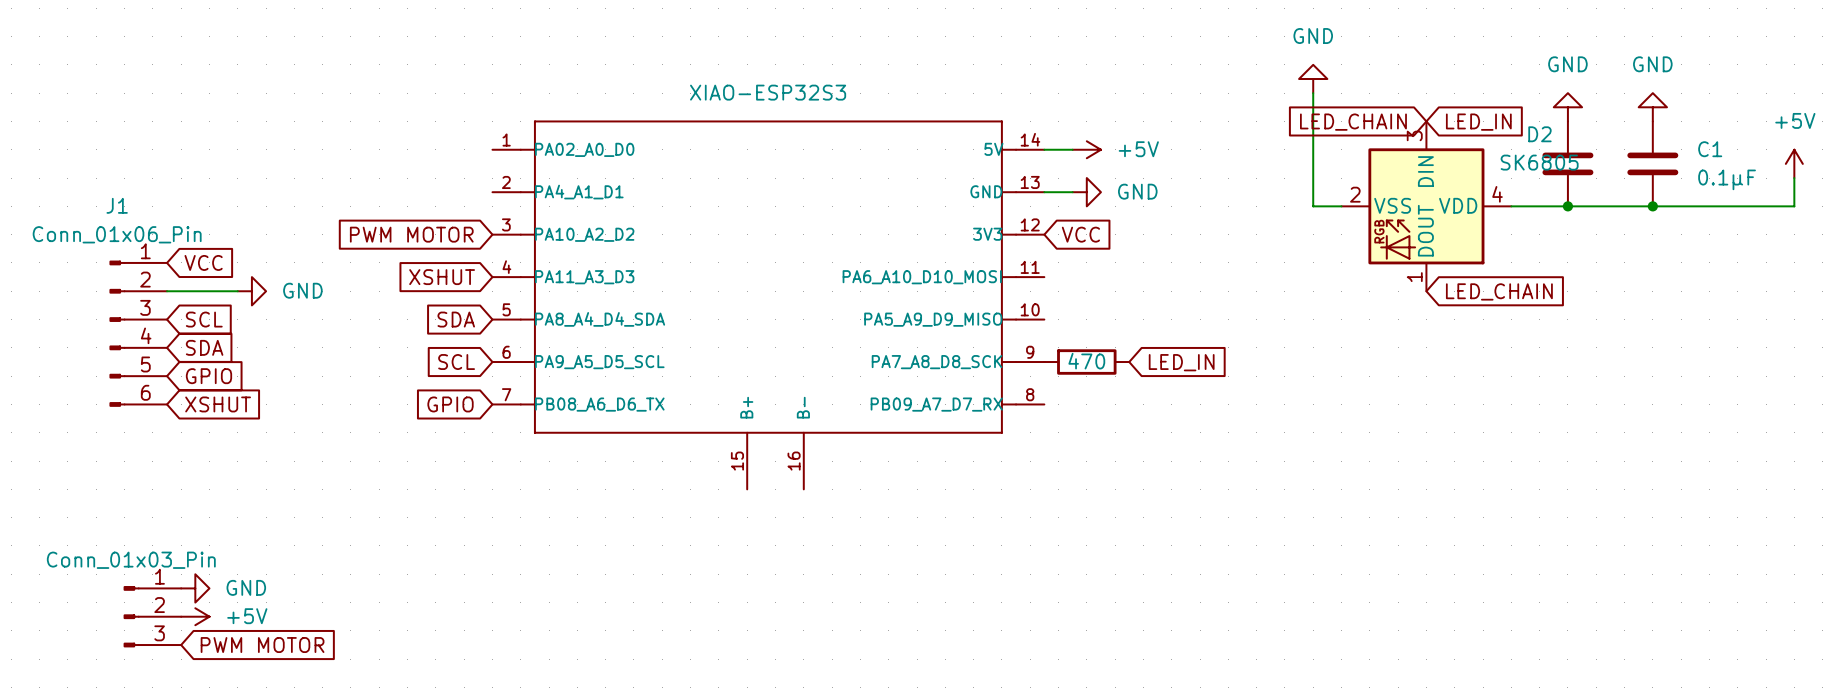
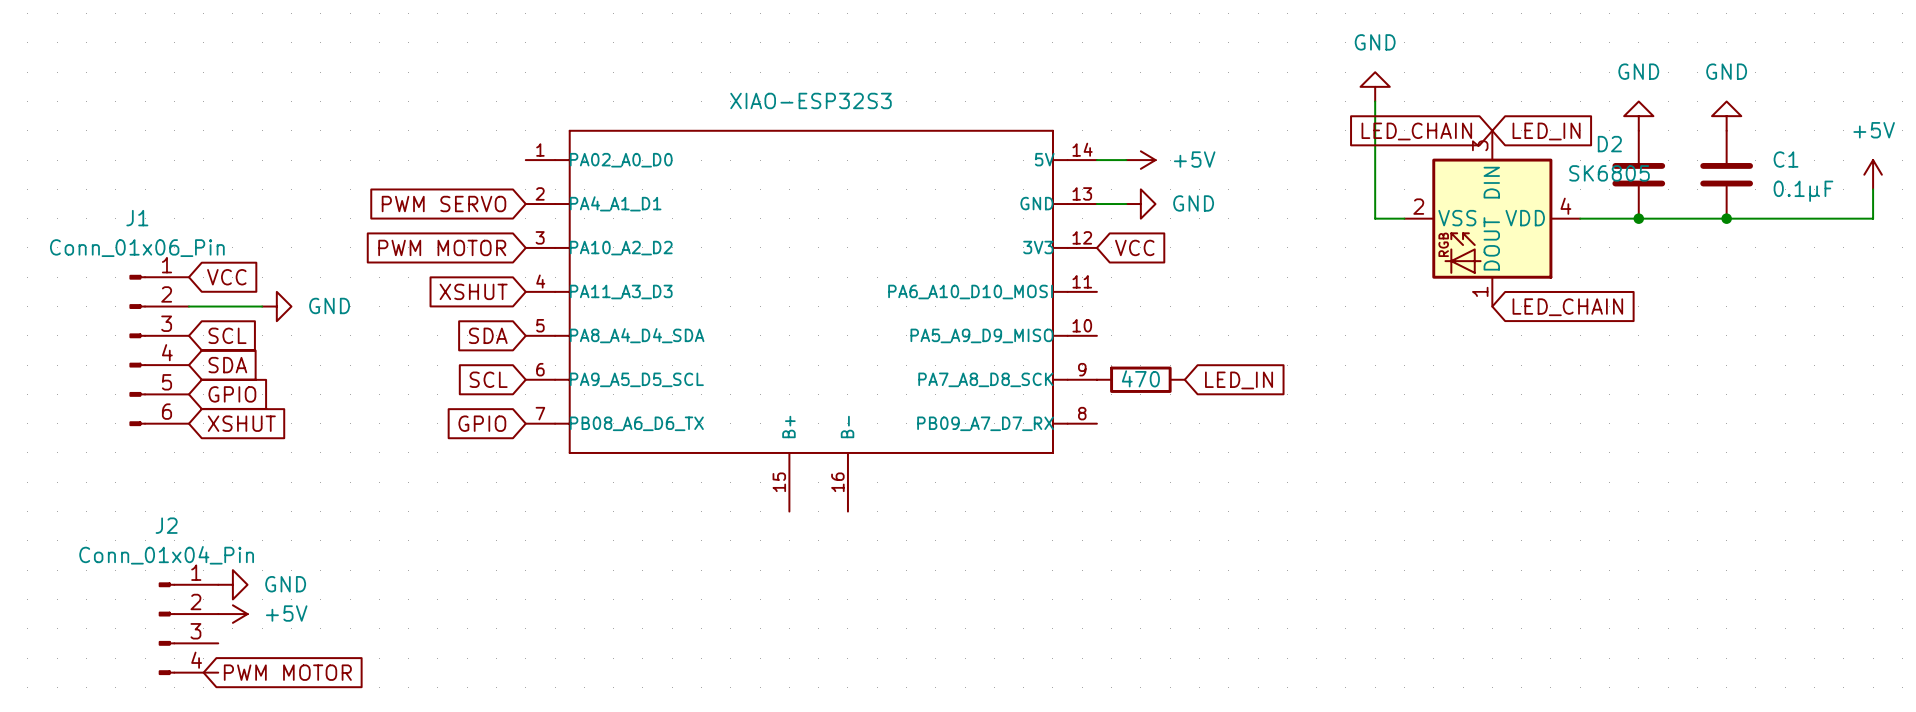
global label: none -> PWM SERVO (443, 204)
power symbol position: GND (195, 588) -> GND (232, 584)
J2: none -> Conn_01x04_Pin (188, 628)
part: Conn_01x03_Pin (152, 616) -> none
power symbol position: +5V (195, 616) -> +5V (232, 614)

